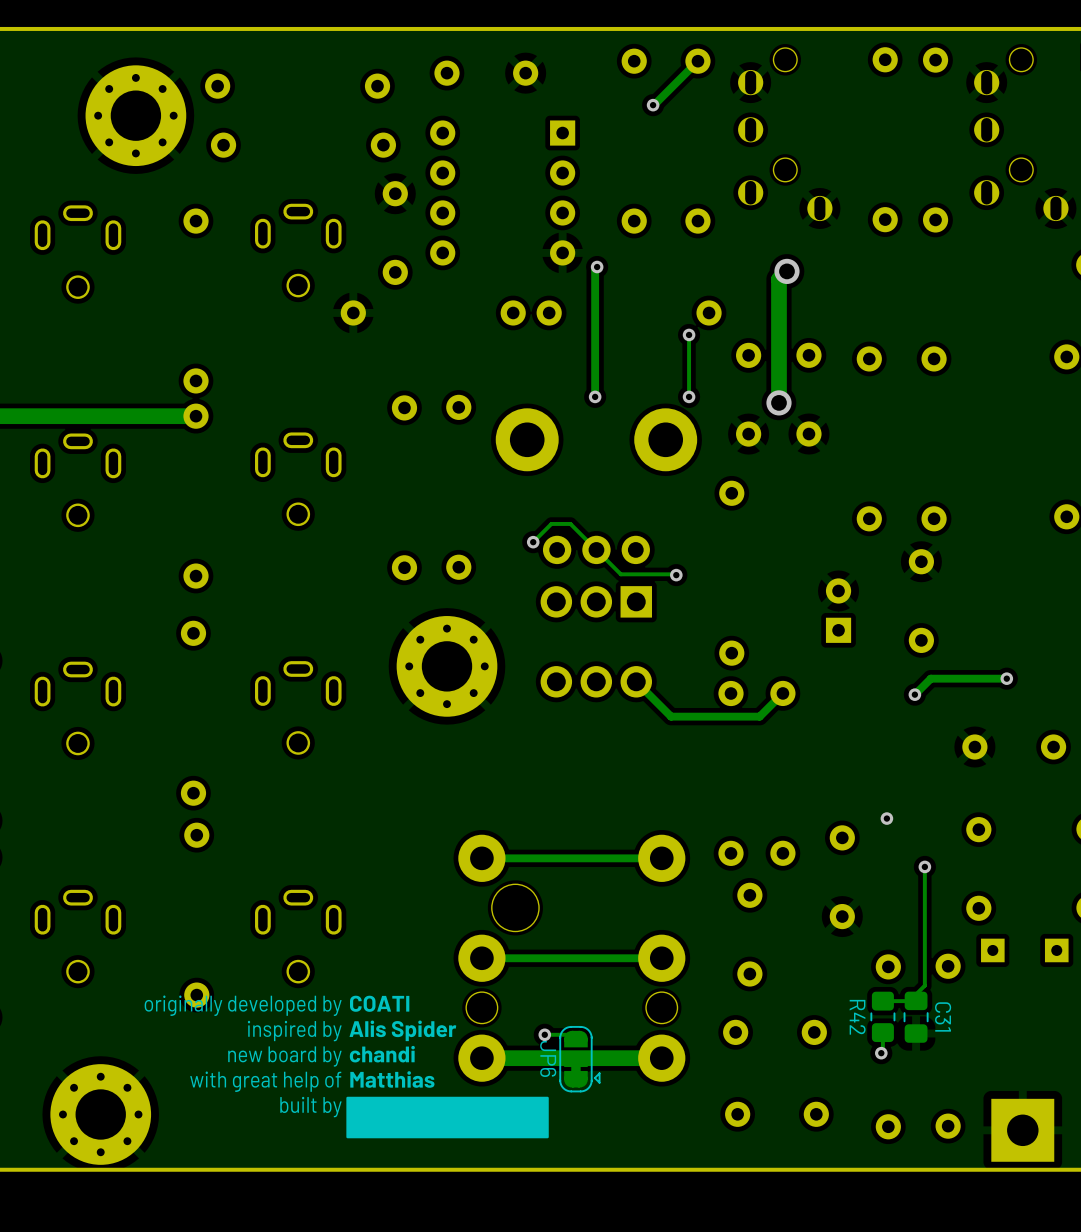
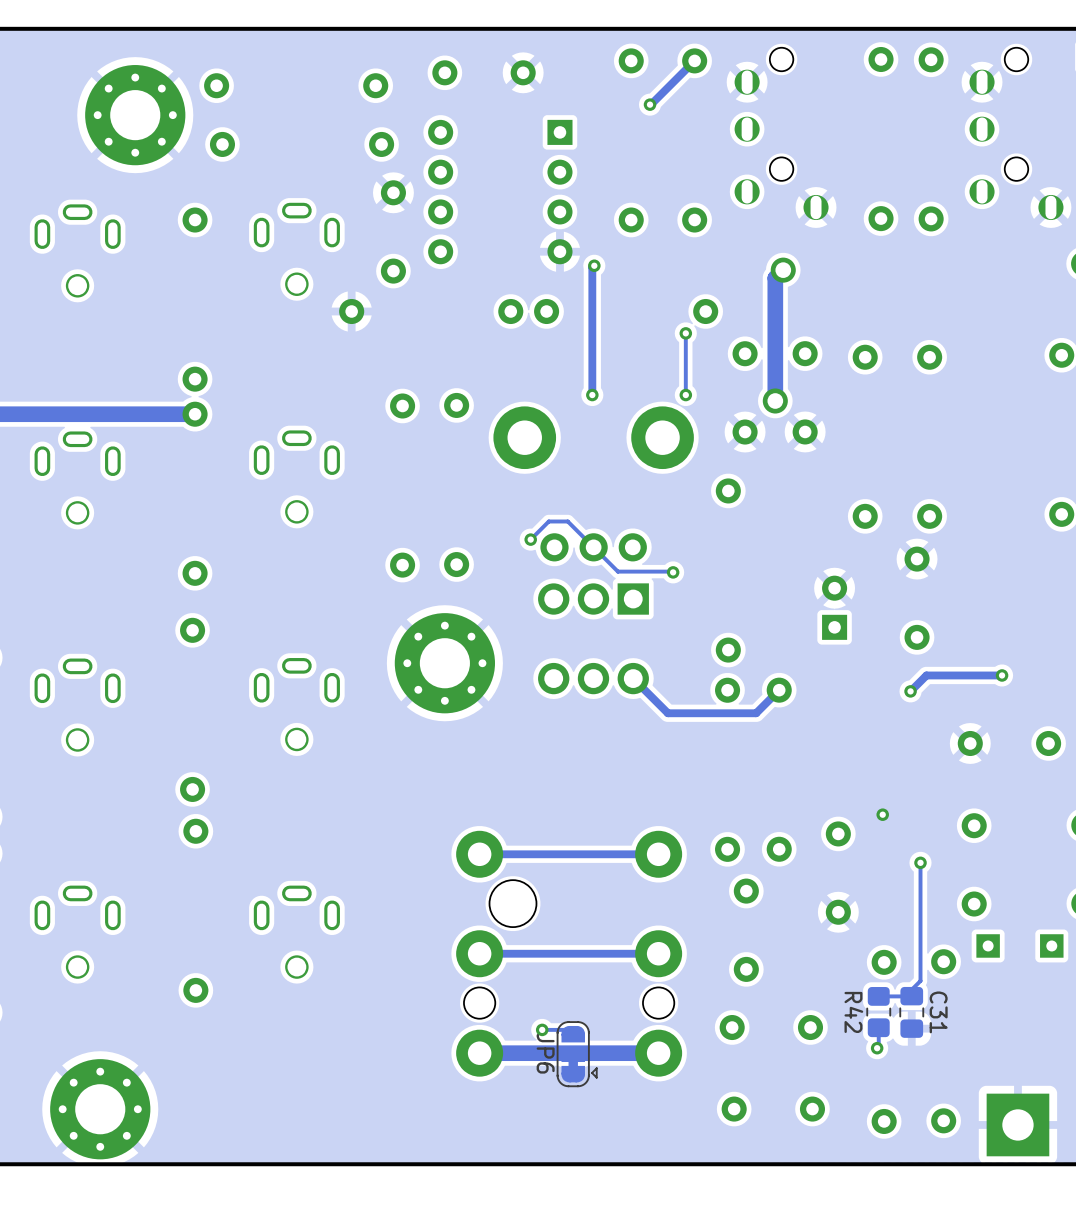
text: COATI (379, 1003) -> none
text: originally developed by (243, 1005) -> none
text: Alis Spider (402, 1030) -> none
text: inspired by (294, 1031) -> none
text: chandi (382, 1054) -> none
text: new board by (284, 1056) -> none
text: Matthias (392, 1079) -> none
text: with great help of (265, 1081) -> none
drawing: [346, 1096, 549, 1139] -> none
text: built by (310, 1107) -> none

